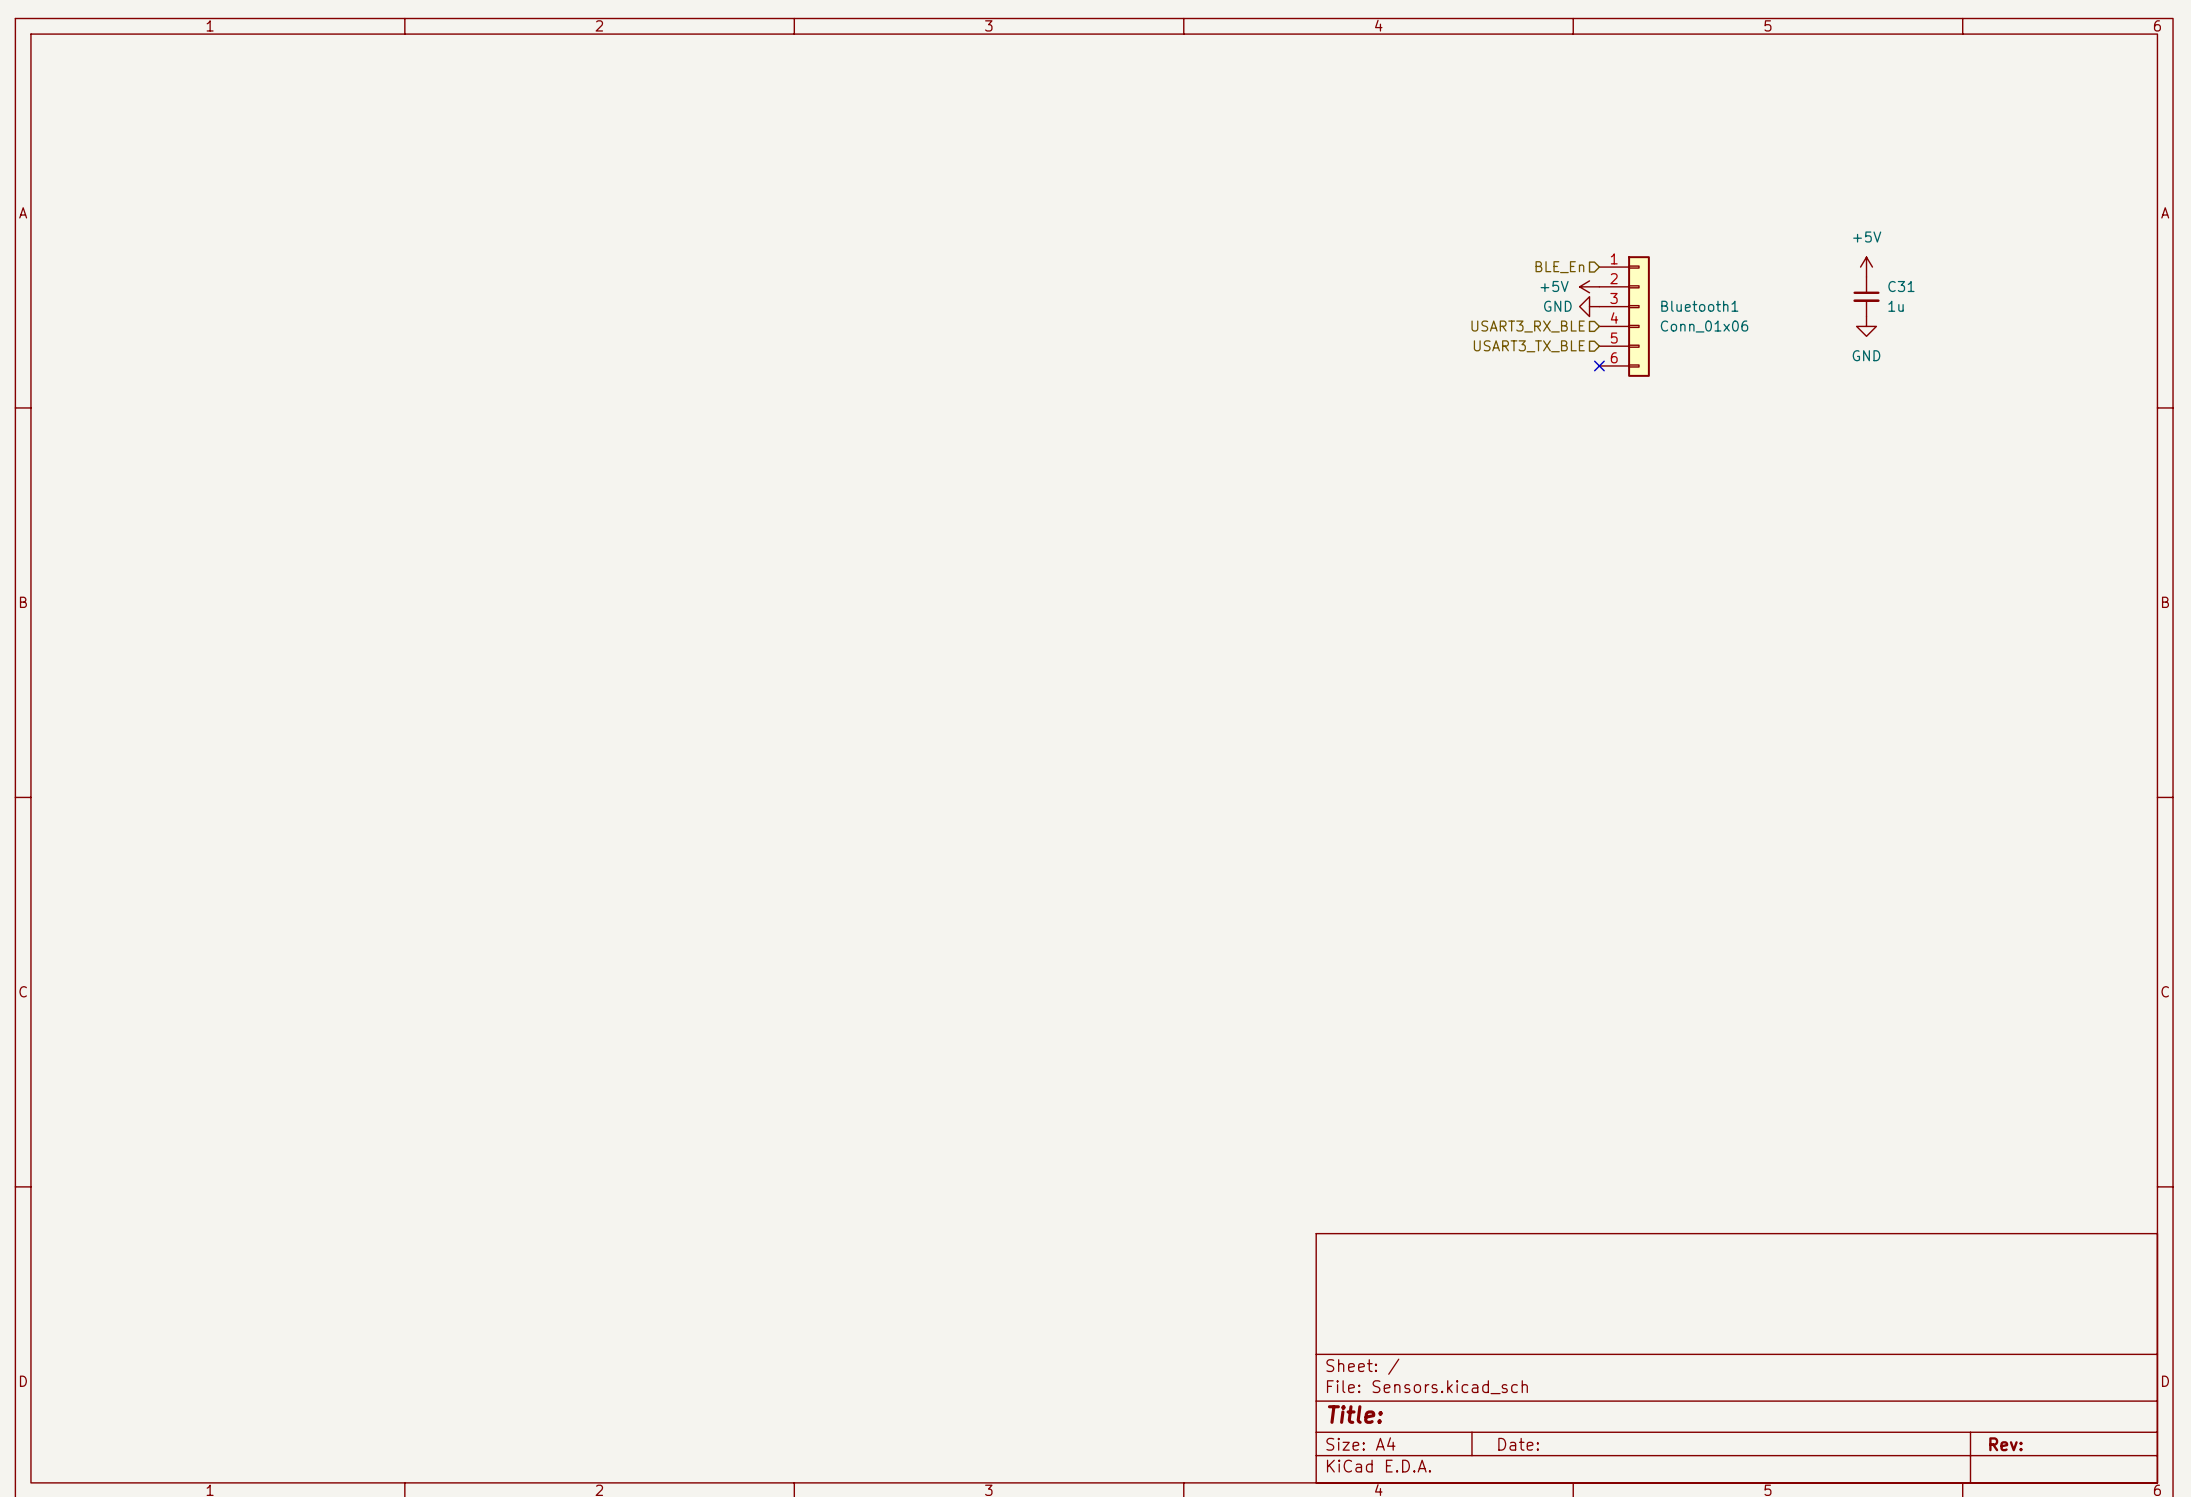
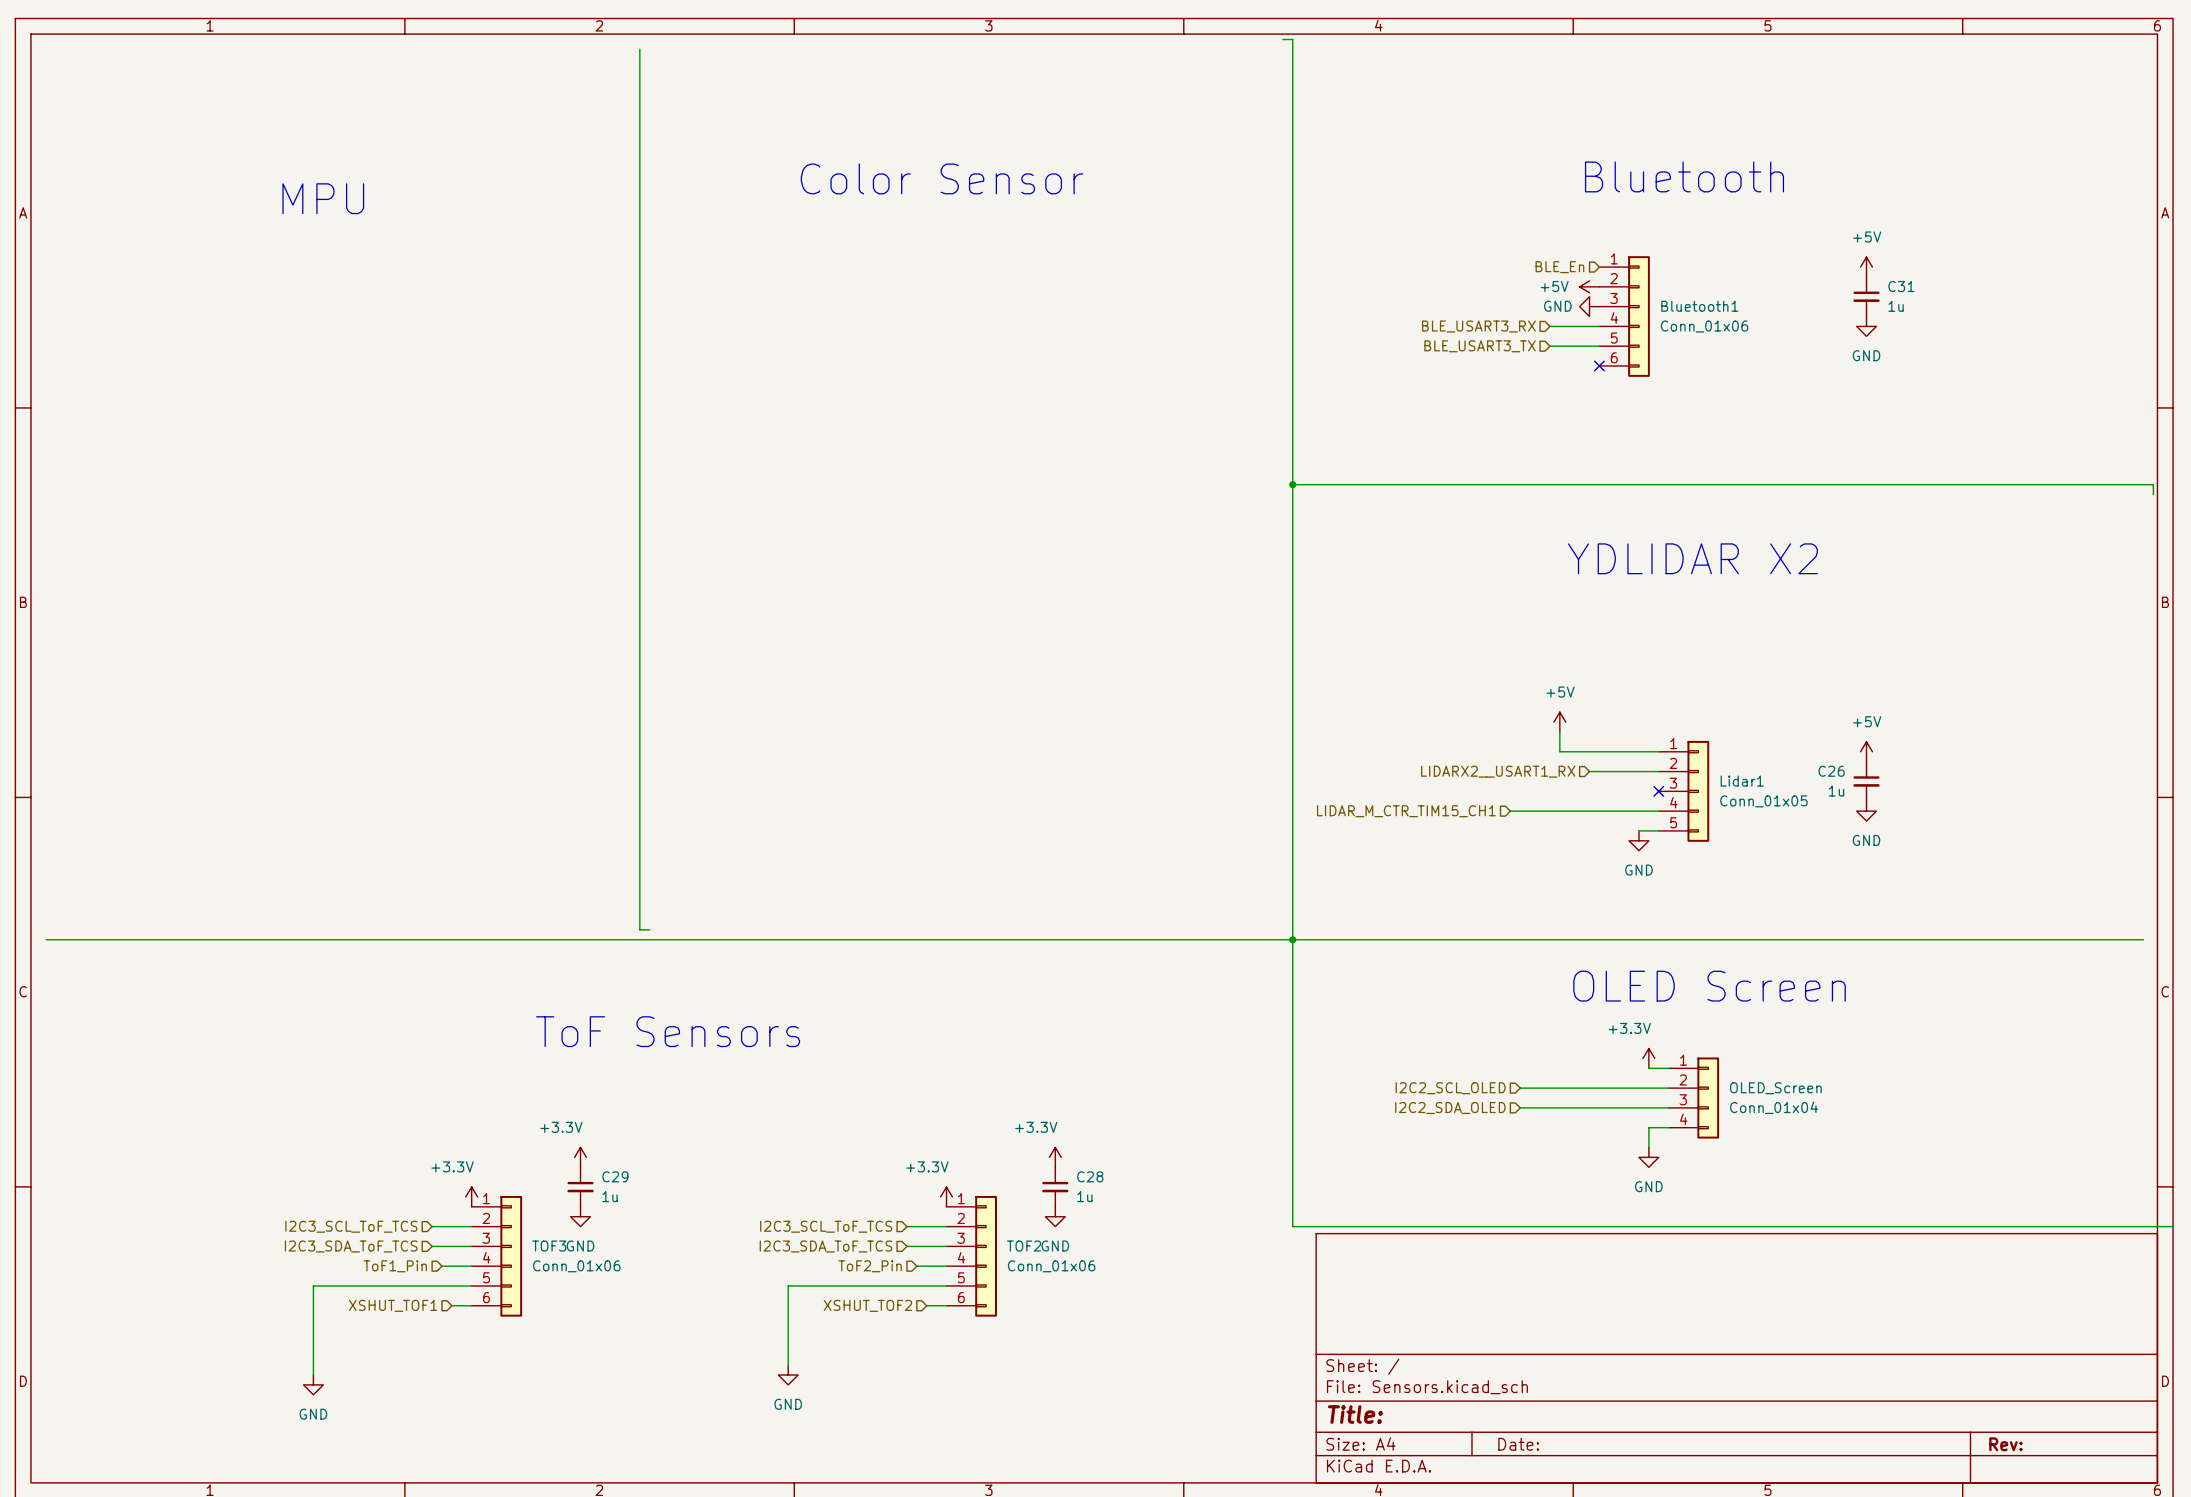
wire: none -> (1282, 39) (1292, 39) (1292, 1226) (2173, 1226)
wire: none -> (639, 49) (639, 929) (649, 929)
text: none -> Bluetooth (1684, 176)
text: none -> Color Sensor (941, 178)
text: none -> MPU (323, 198)
hierarchical label: none -> BLE_USART3_RX (1478, 326)
hierarchical label: USART3_RX_BLE (1528, 326) -> none
wire: none -> (1549, 326) (1599, 326)
hierarchical label: none -> BLE_USART3_TX (1480, 346)
hierarchical label: USART3_TX_BLE (1529, 346) -> none
wire: none -> (1549, 346) (1599, 346)
wire: none -> (1292, 484) (2153, 484) (2153, 494)
junction: none -> (1292, 484)
text: none -> YDLIDAR X2 (1692, 558)
power symbol: none -> +5V (1559, 722)
wire: none -> (1559, 732) (1559, 751) (1658, 751)
power symbol: none -> +5V (1866, 751)
hierarchical label: none -> LIDARX2__USART1_RX (1498, 771)
wire: none -> (1589, 771) (1658, 771)
C26: none -> 1u (1866, 781)
no-connect mark: none -> (1658, 791)
Lidar1: none -> Conn_01x05 (1683, 791)
hierarchical label: none -> LIDAR_M_CTR_TIM15_CH1 (1406, 811)
wire: none -> (1510, 811) (1658, 811)
power symbol: none -> GND (1866, 811)
wire: none -> (1638, 830) (1658, 830)
power symbol: none -> GND (1638, 840)
wire: none -> (46, 939) (2143, 939)
junction: none -> (1292, 939)
text: none -> OLED Screen (1709, 986)
text: none -> ToF Sensors (668, 1031)
power symbol: none -> +3.3V (1648, 1058)
wire: none -> (1648, 1068) (1668, 1068)
hierarchical label: none -> I2C2_SCL_OLED (1450, 1088)
wire: none -> (1520, 1088) (1668, 1088)
OLED_Screen: none -> Conn_01x04 (1693, 1098)
wire: none -> (1520, 1107) (1668, 1107)
hierarchical label: none -> I2C2_SDA_OLED (1450, 1108)
wire: none -> (1668, 1127) (1648, 1127) (1648, 1147)
power symbol: none -> +3.3V (580, 1157)
power symbol: none -> +3.3V (1055, 1157)
power symbol: none -> GND (1648, 1157)
C29: none -> 1u (580, 1187)
C28: none -> 1u (1055, 1187)
power symbol: none -> +3.3V (471, 1196)
power symbol: none -> +3.3V (946, 1196)
power symbol: none -> GND (580, 1216)
power symbol: none -> GND (1055, 1216)
hierarchical label: none -> I2C3_SCL_ToF_TCS (351, 1226)
wire: none -> (432, 1226) (471, 1226)
hierarchical label: none -> I2C3_SCL_ToF_TCS (826, 1226)
wire: none -> (906, 1226) (946, 1226)
hierarchical label: none -> I2C3_SDA_ToF_TCS (351, 1246)
wire: none -> (432, 1246) (471, 1246)
hierarchical label: none -> I2C3_SDA_ToF_TCS (826, 1246)
wire: none -> (906, 1246) (946, 1246)
TOF3: none -> Conn_01x06 (496, 1256)
TOF2: none -> Conn_01x06 (971, 1256)
hierarchical label: none -> ToF1_Pin (395, 1266)
wire: none -> (442, 1266) (471, 1266)
hierarchical label: none -> ToF2_Pin (870, 1266)
wire: none -> (916, 1266) (946, 1266)
wire: none -> (471, 1285) (313, 1285) (313, 1375)
wire: none -> (946, 1285) (788, 1285) (788, 1365)
hierarchical label: none -> XSHUT_TOF1 (393, 1305)
wire: none -> (451, 1305) (471, 1305)
hierarchical label: none -> XSHUT_TOF2 (867, 1305)
wire: none -> (926, 1305) (946, 1305)
power symbol: none -> GND (788, 1375)
power symbol: none -> GND (313, 1384)

